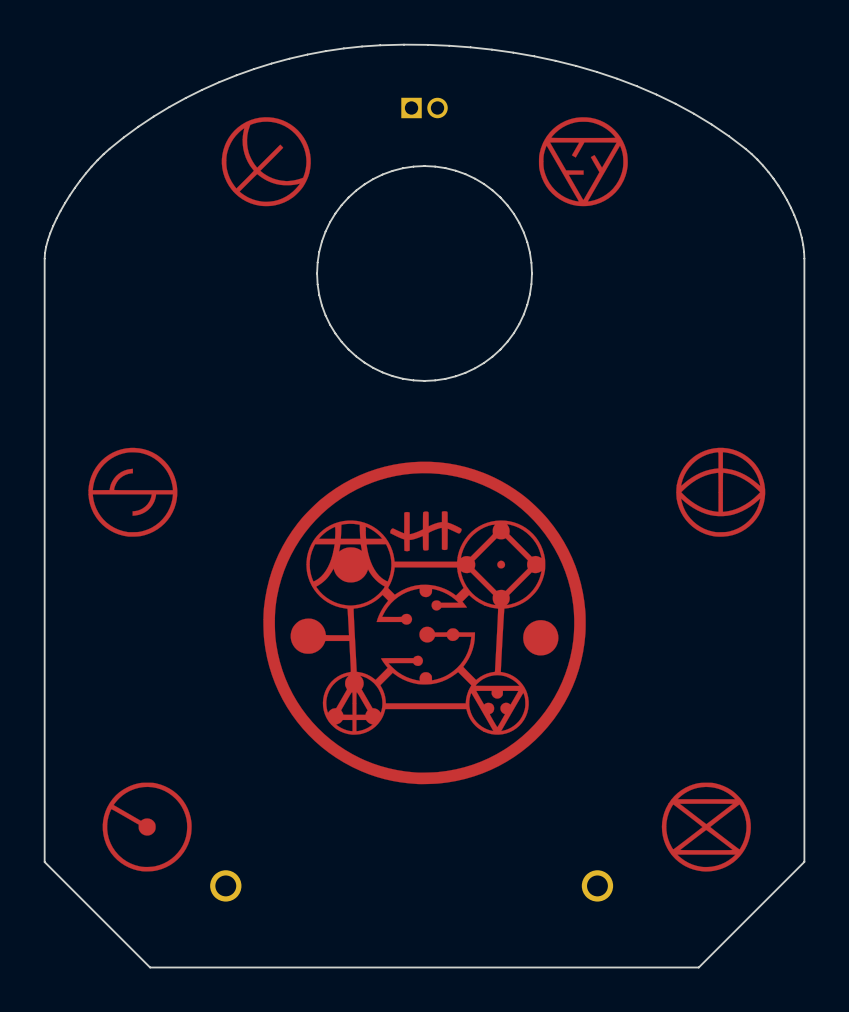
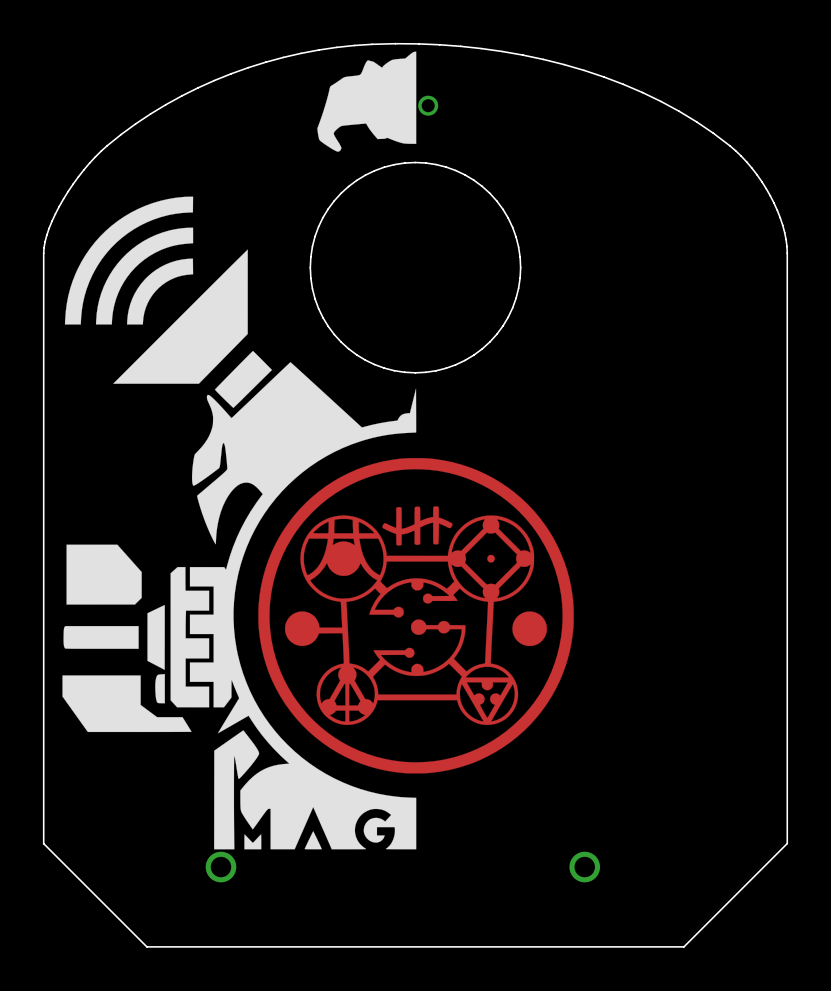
drawing: none -> [62, 51, 574, 850]
drawing: [88, 117, 766, 872] -> none

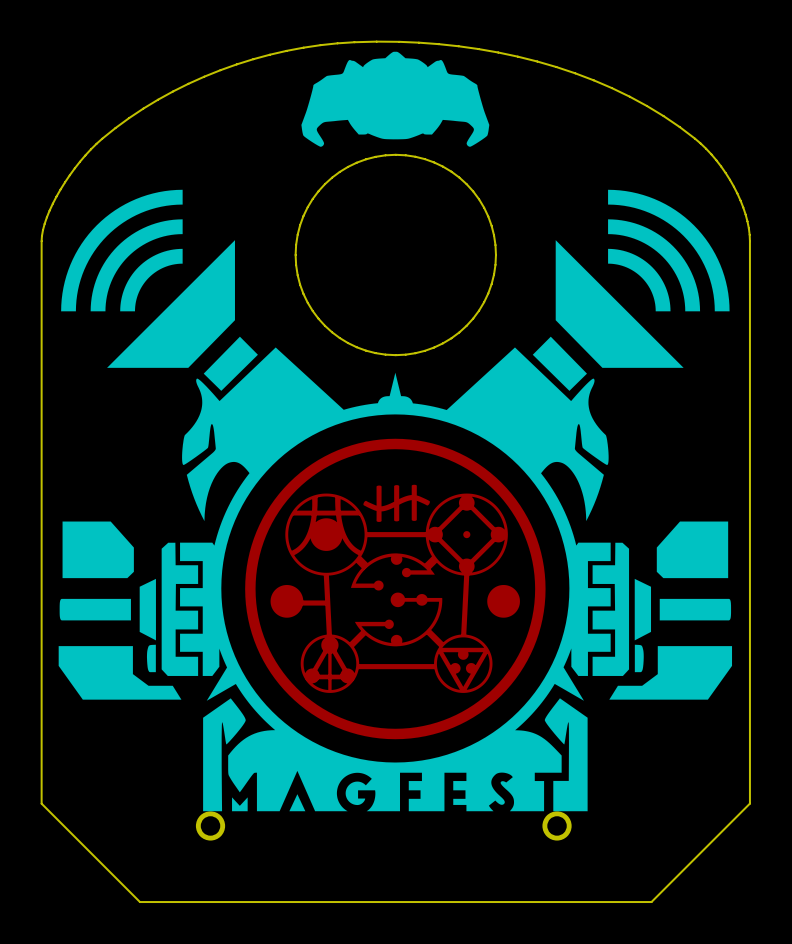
drawing: [62, 51, 574, 850] -> none
drawing: none -> [301, 51, 490, 147]
drawing: none -> [58, 189, 733, 812]

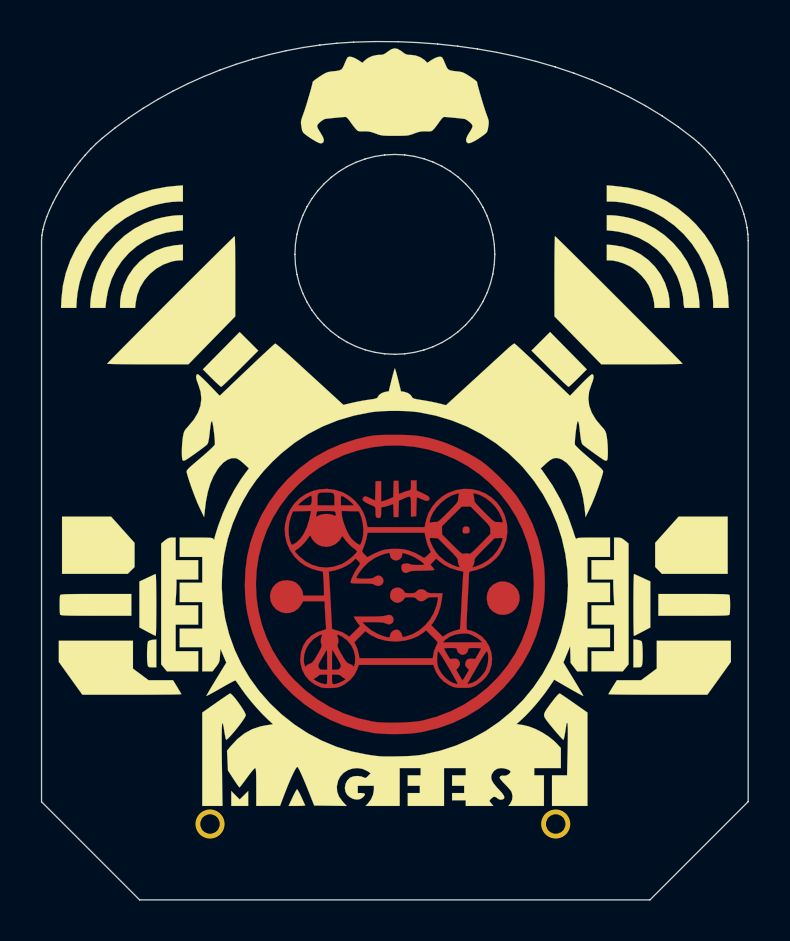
drawing: none -> [58, 48, 731, 807]
drawing: [301, 51, 490, 147] -> none
drawing: [58, 189, 733, 812] -> none

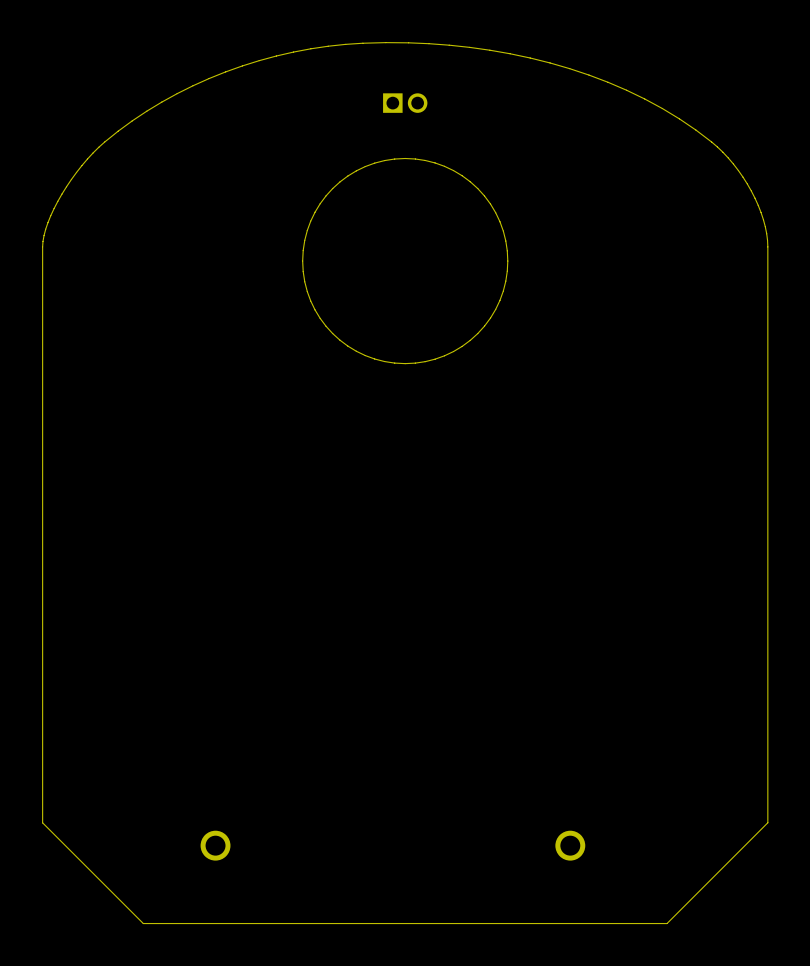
drawing: [58, 48, 731, 807] -> none

